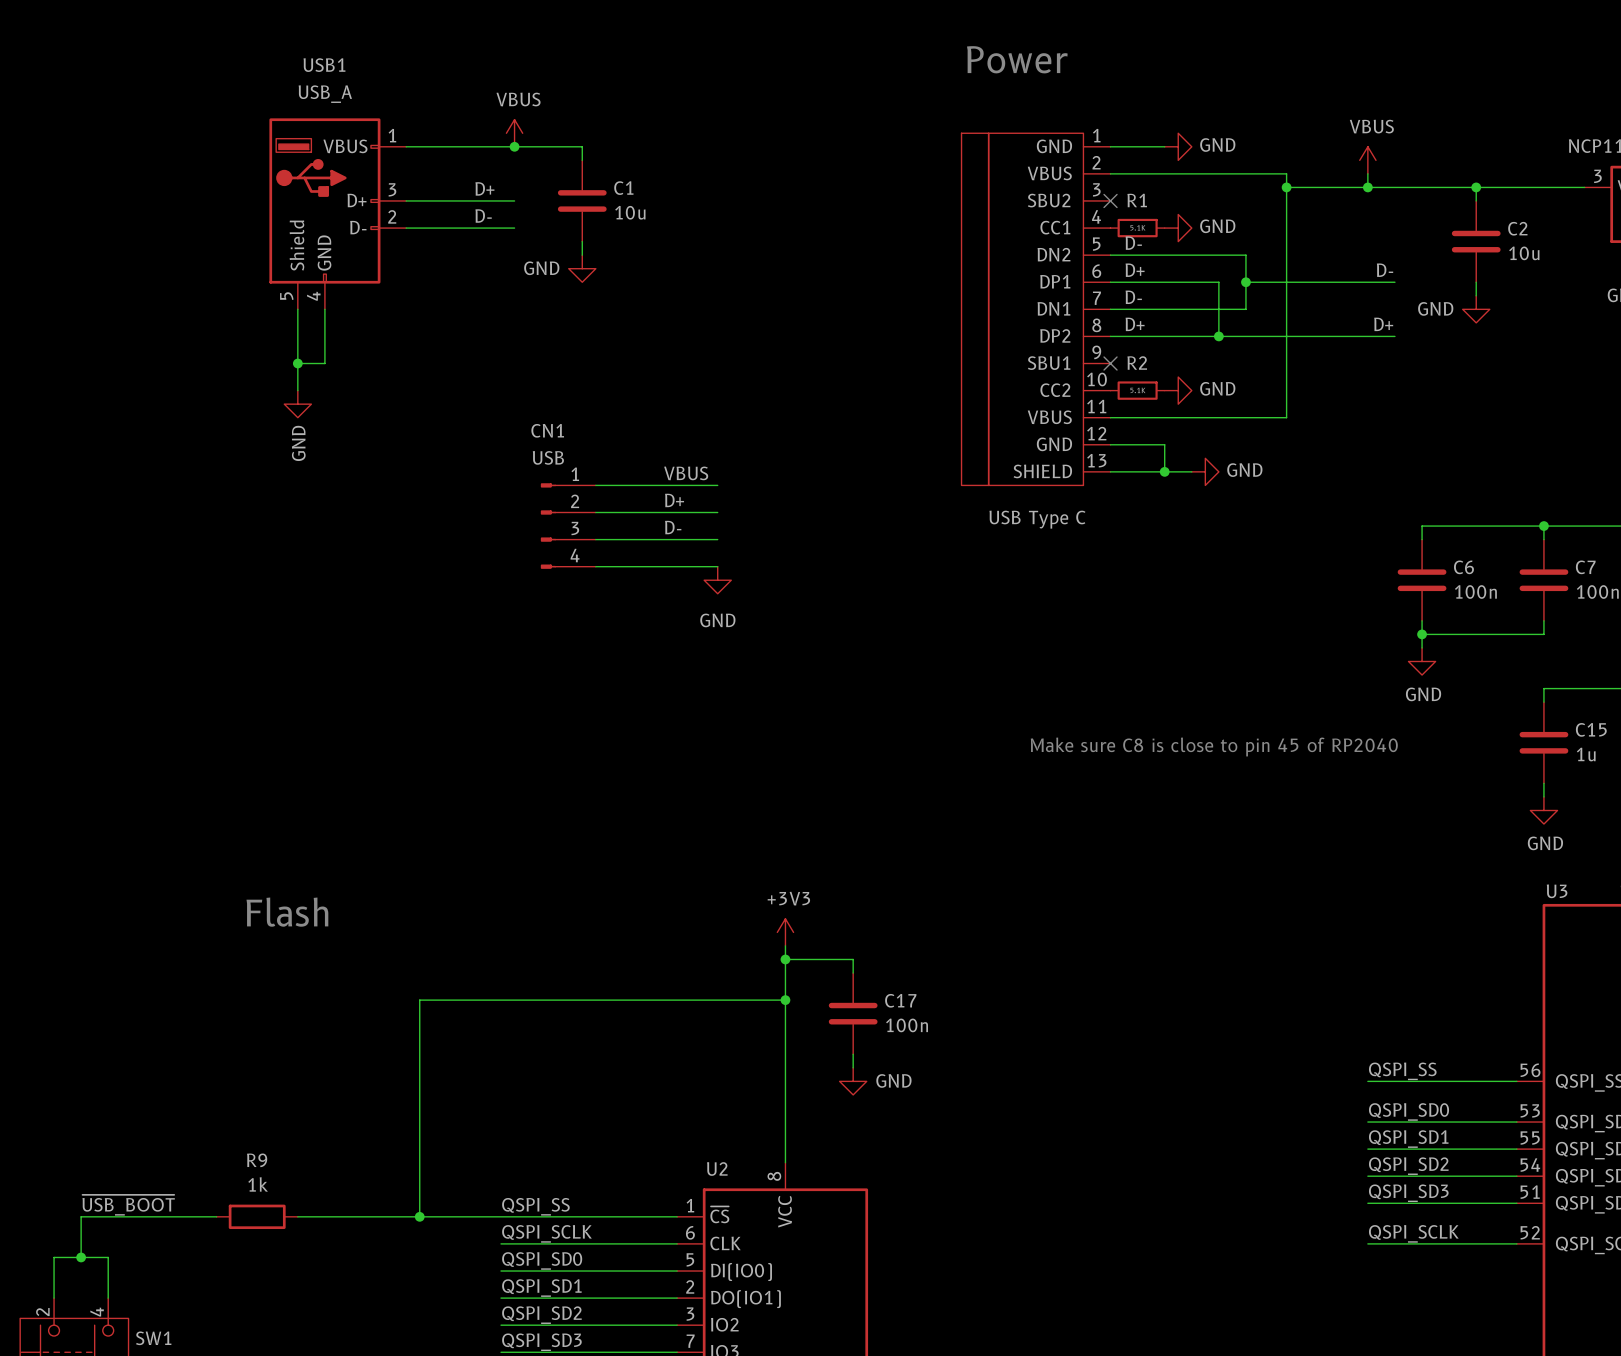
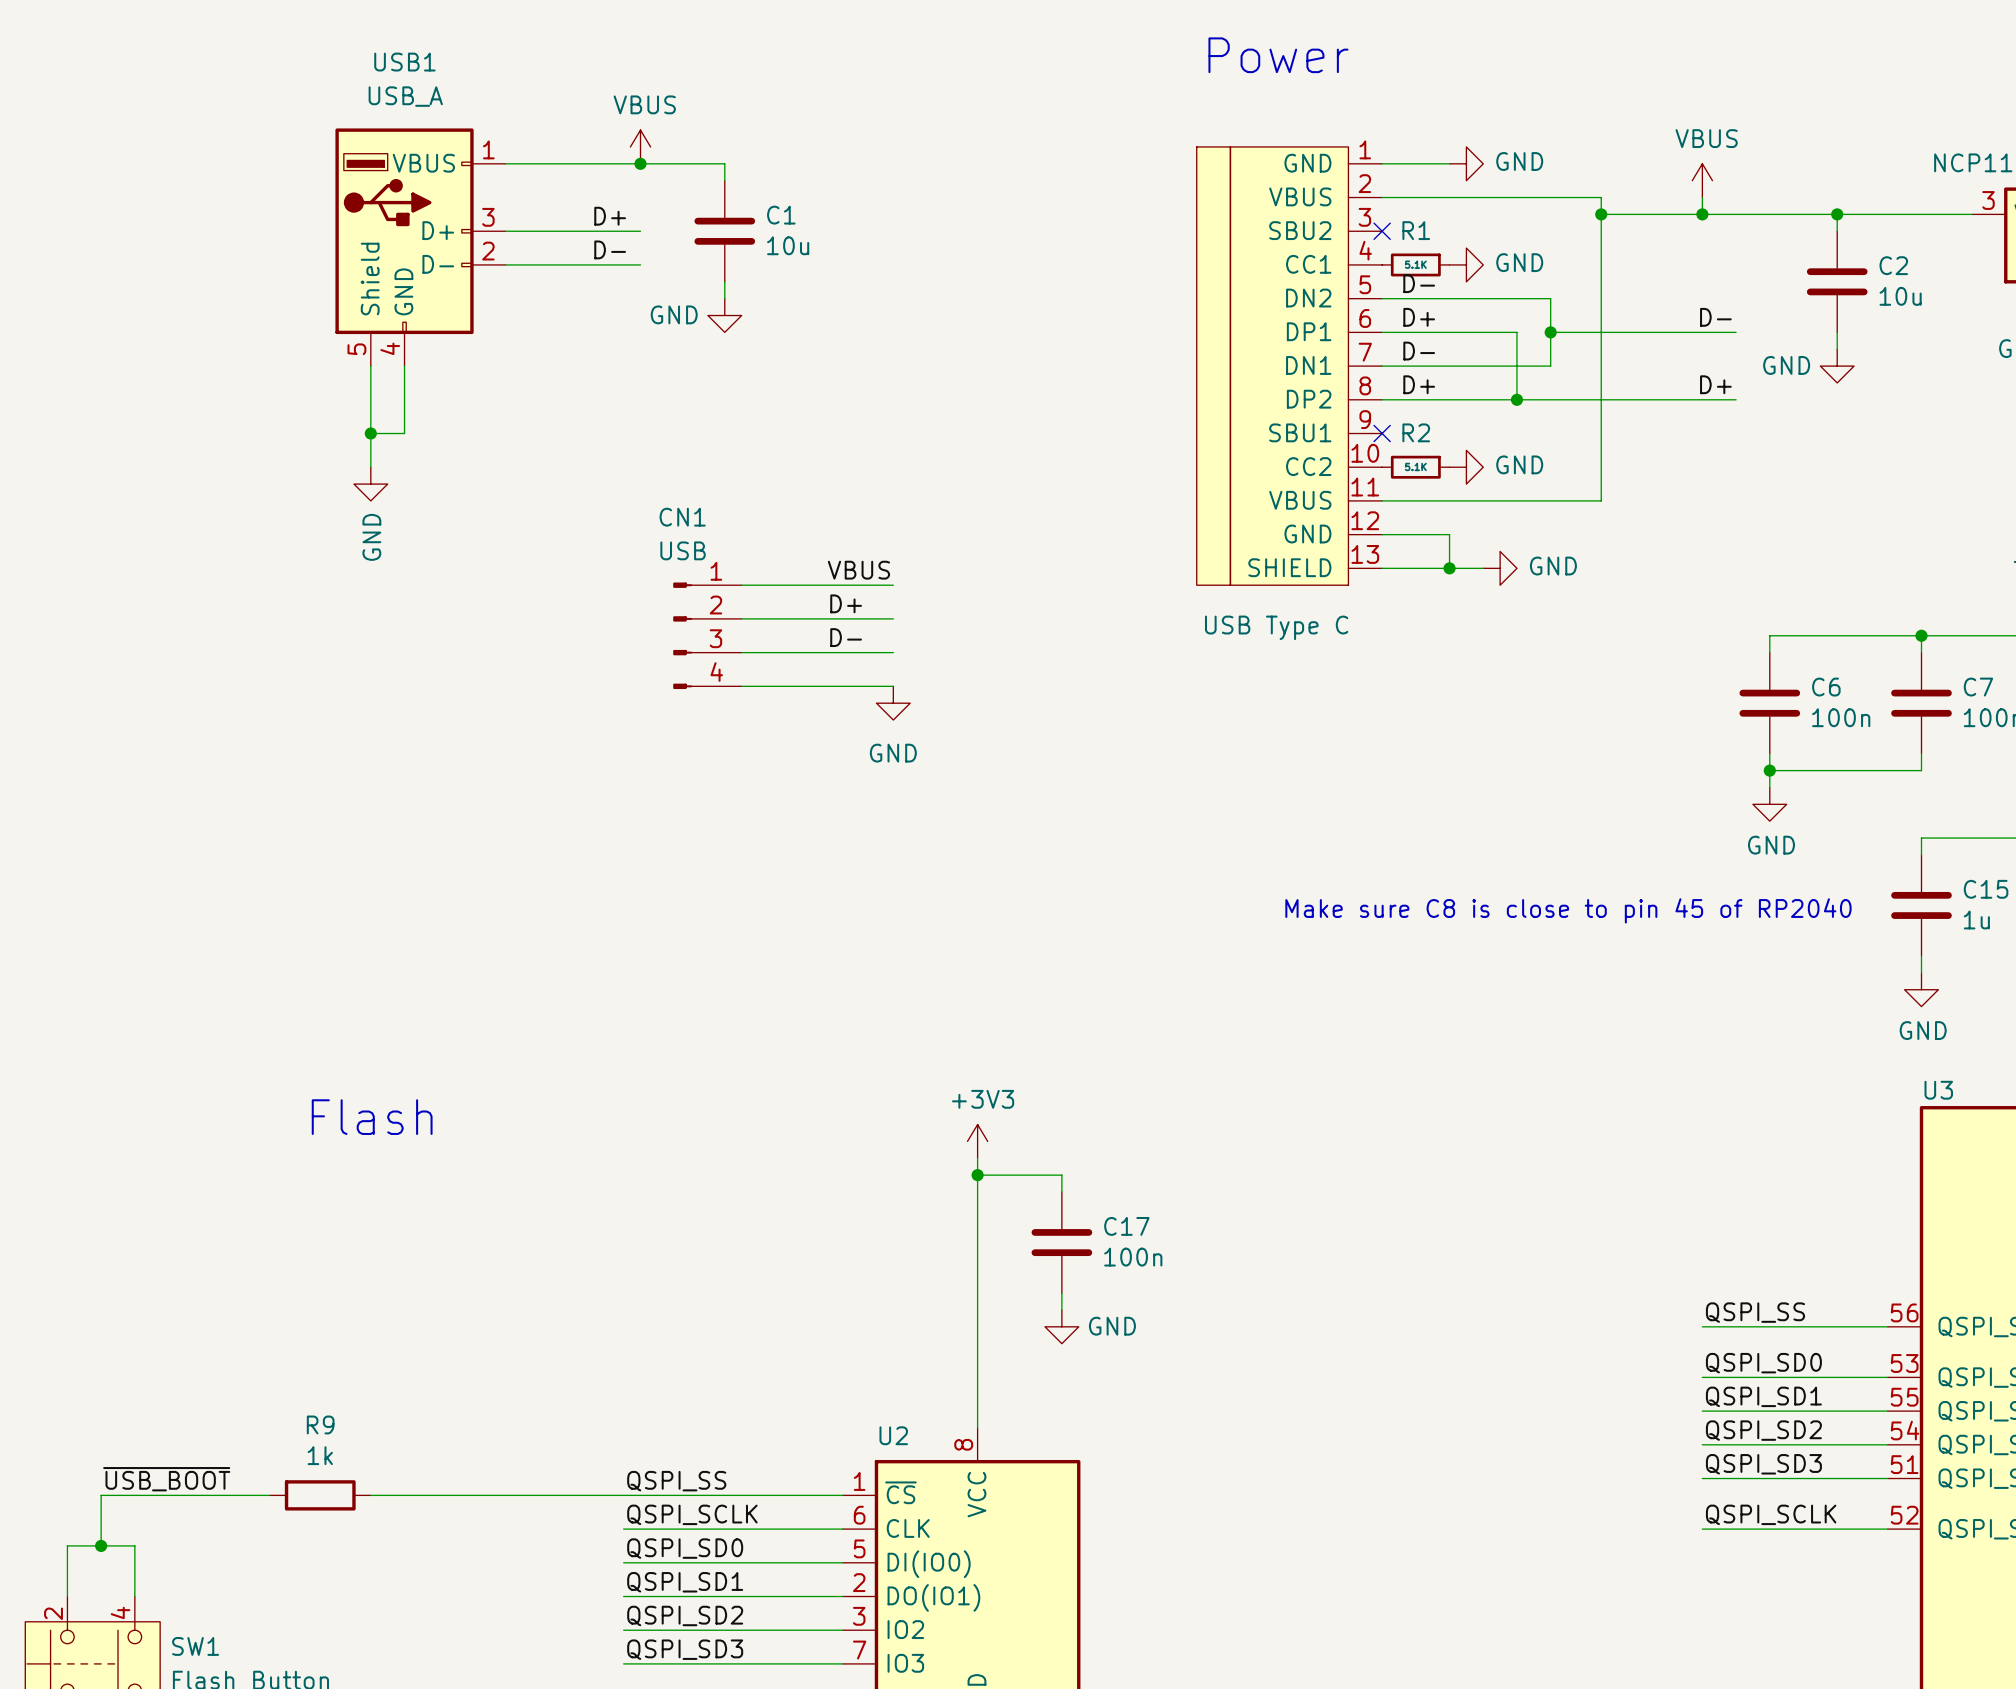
wire: (785, 1000) (419, 1000) (419, 1216) -> none
junction: (785, 1000) -> none
junction: (419, 1216) -> none

